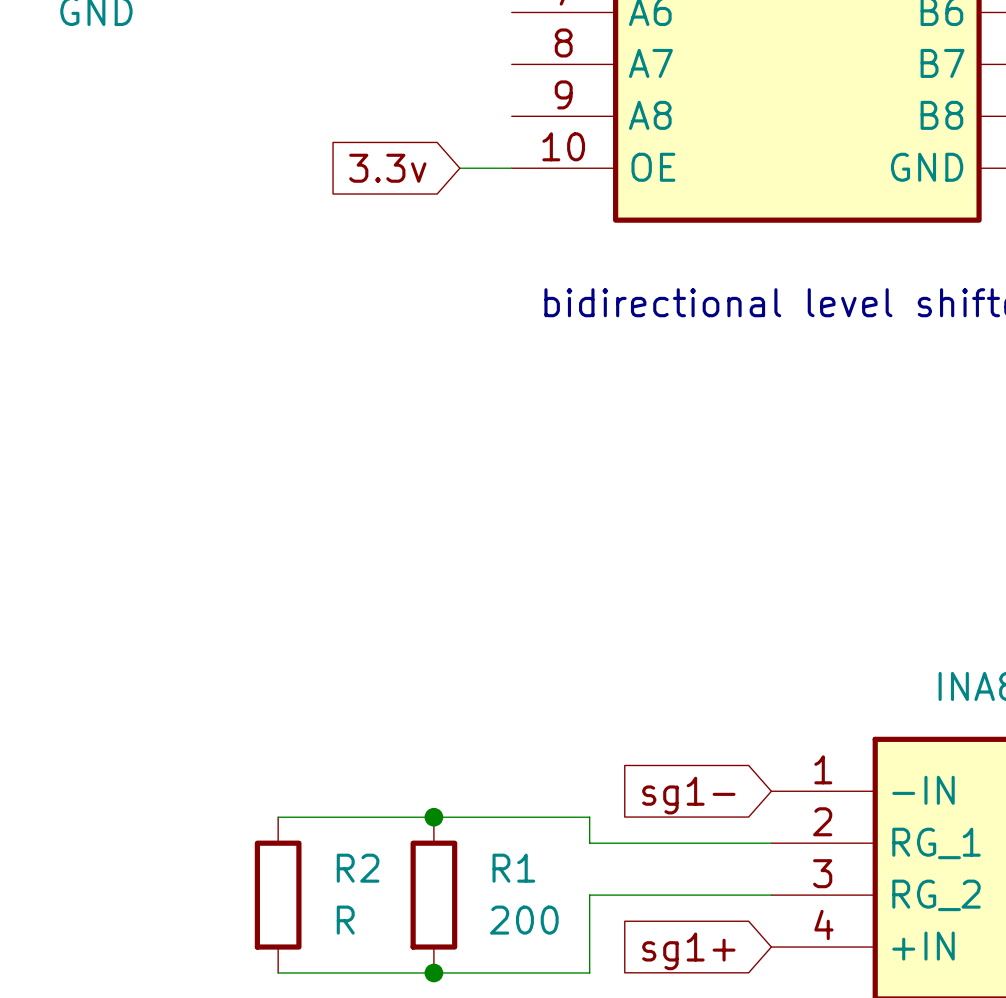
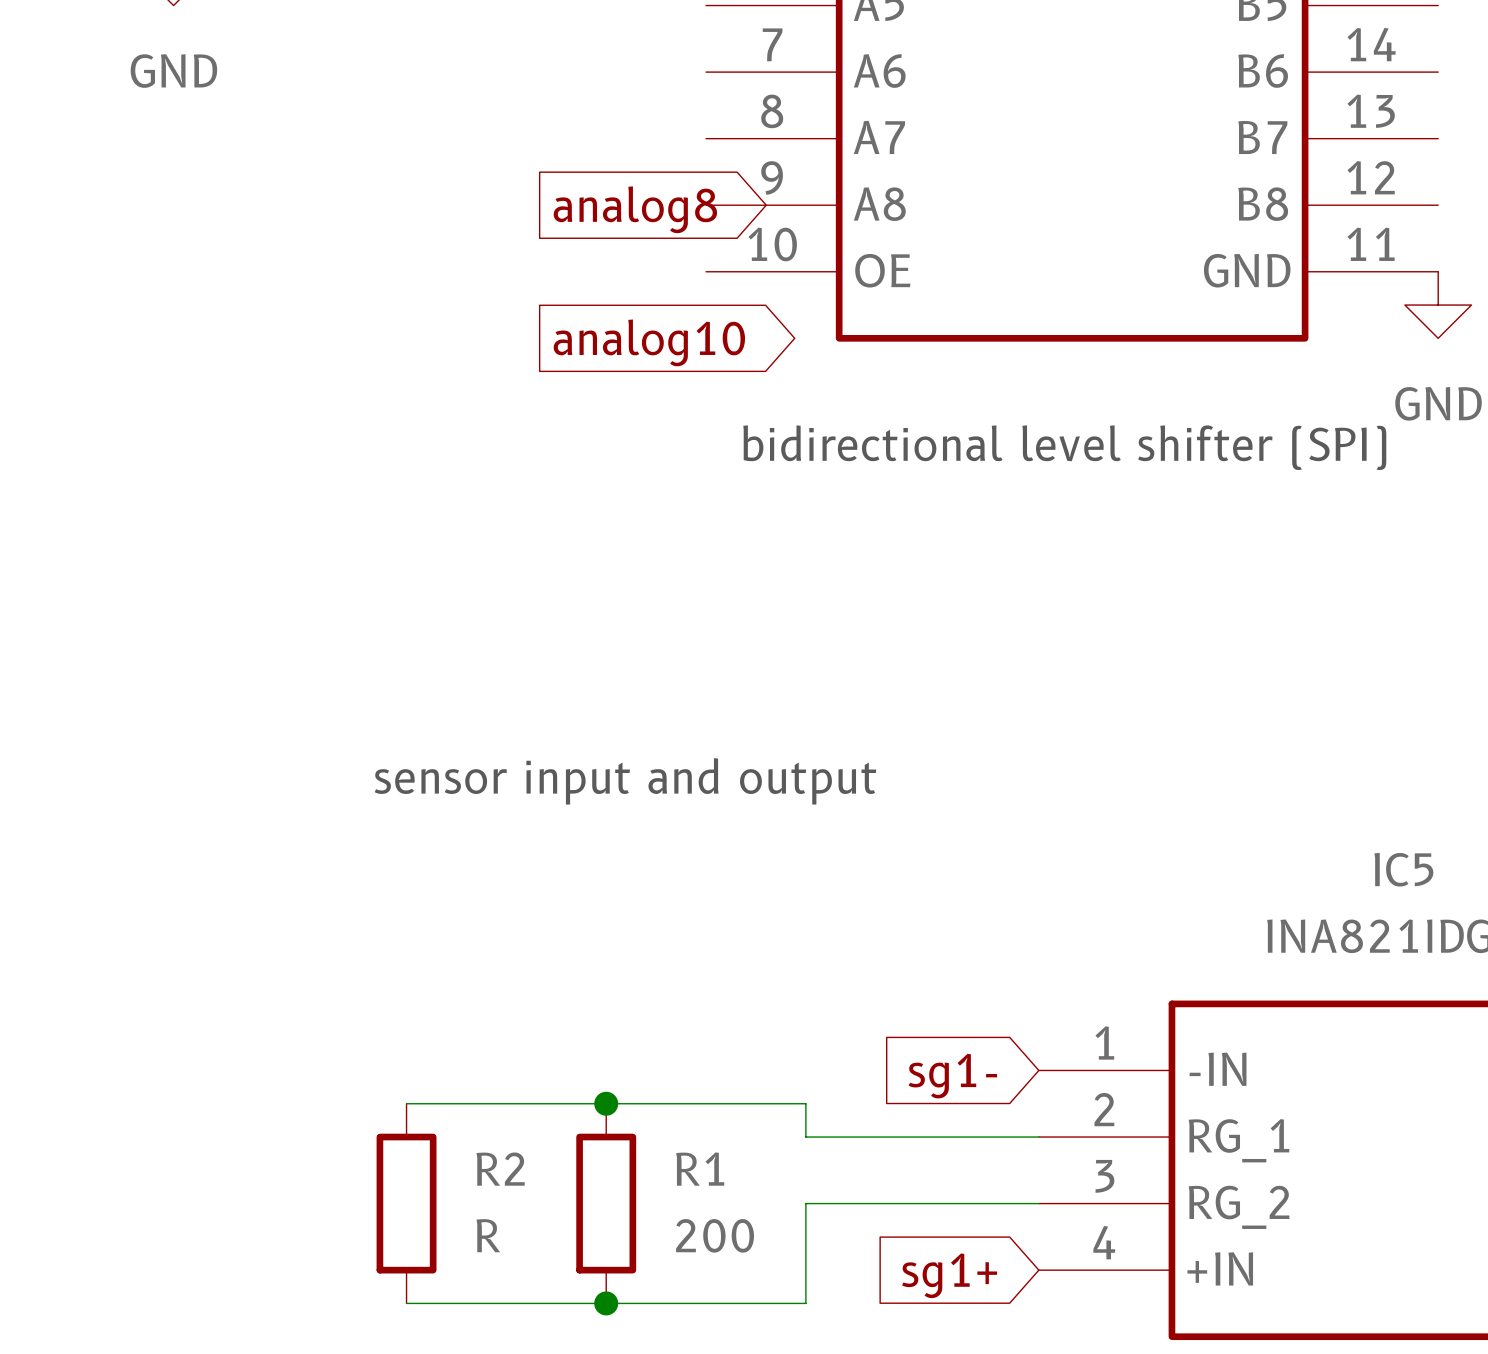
global label: none -> analog8 (635, 209)
global label: 3.3v (387, 168) -> none
wire: (459, 168) (511, 168) -> none
global label: none -> analog10 (649, 342)
text: none -> sensor input and output (625, 781)

